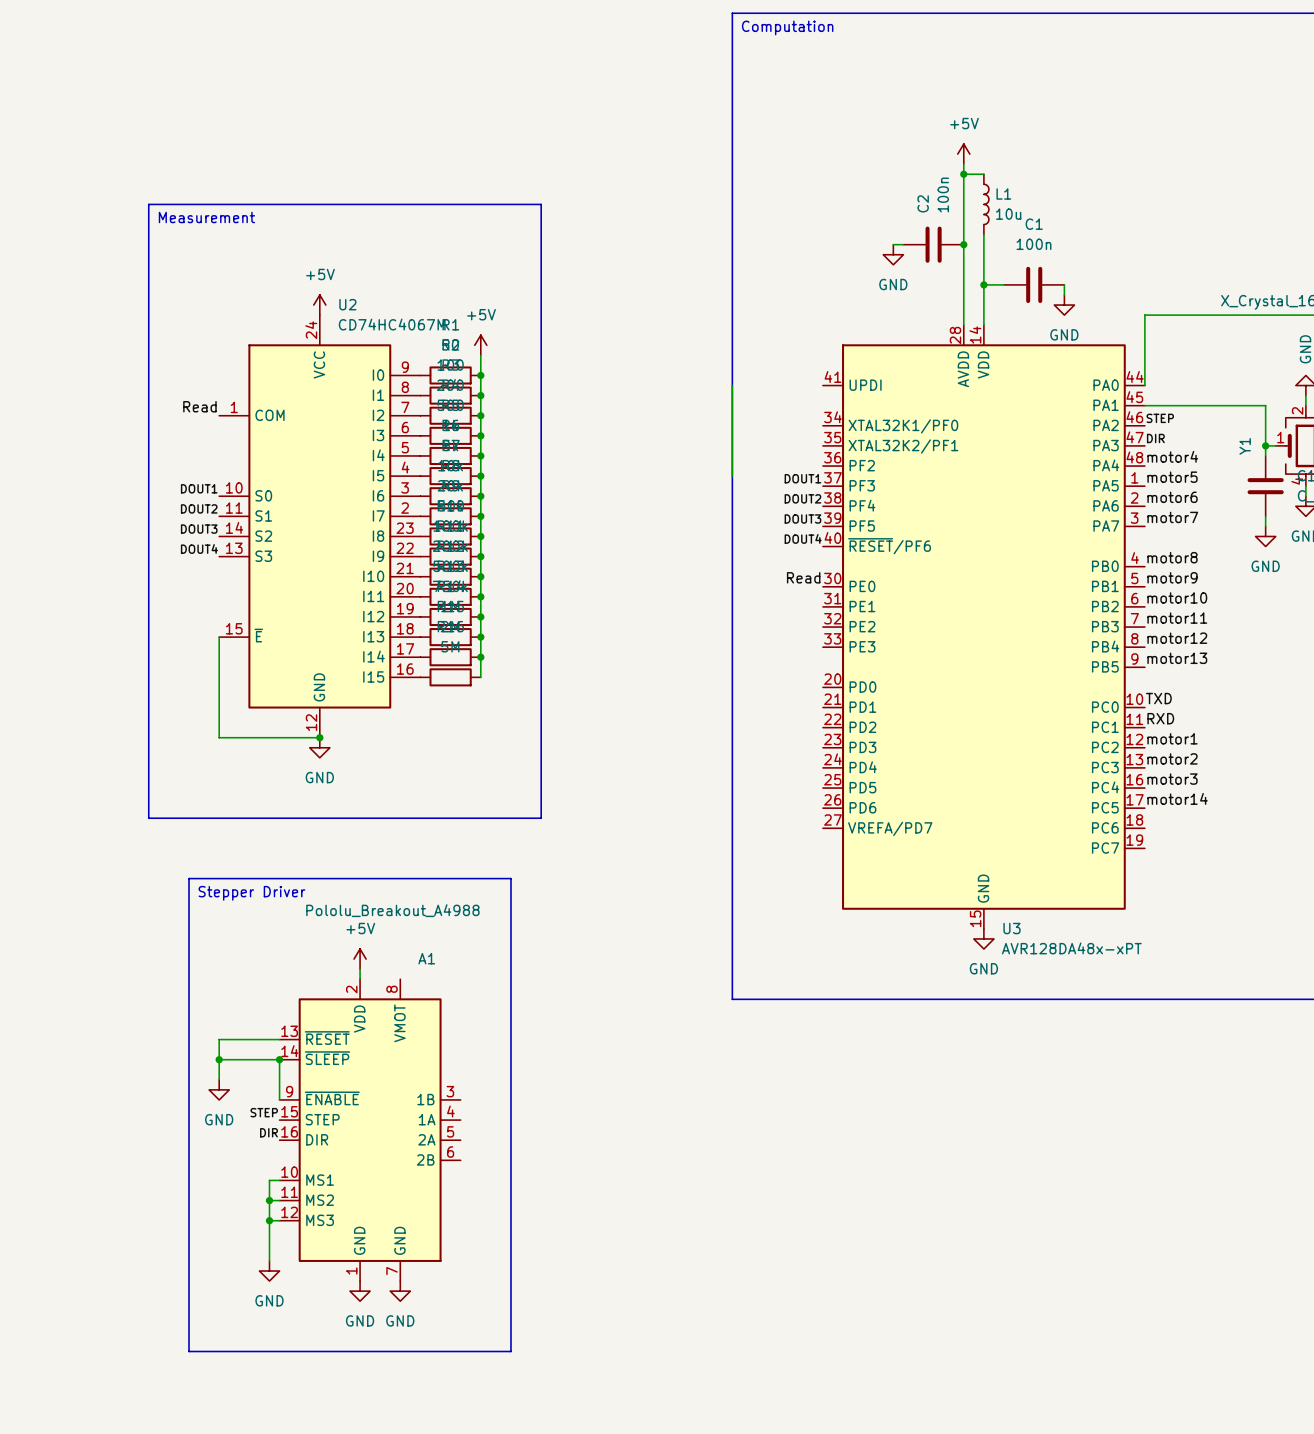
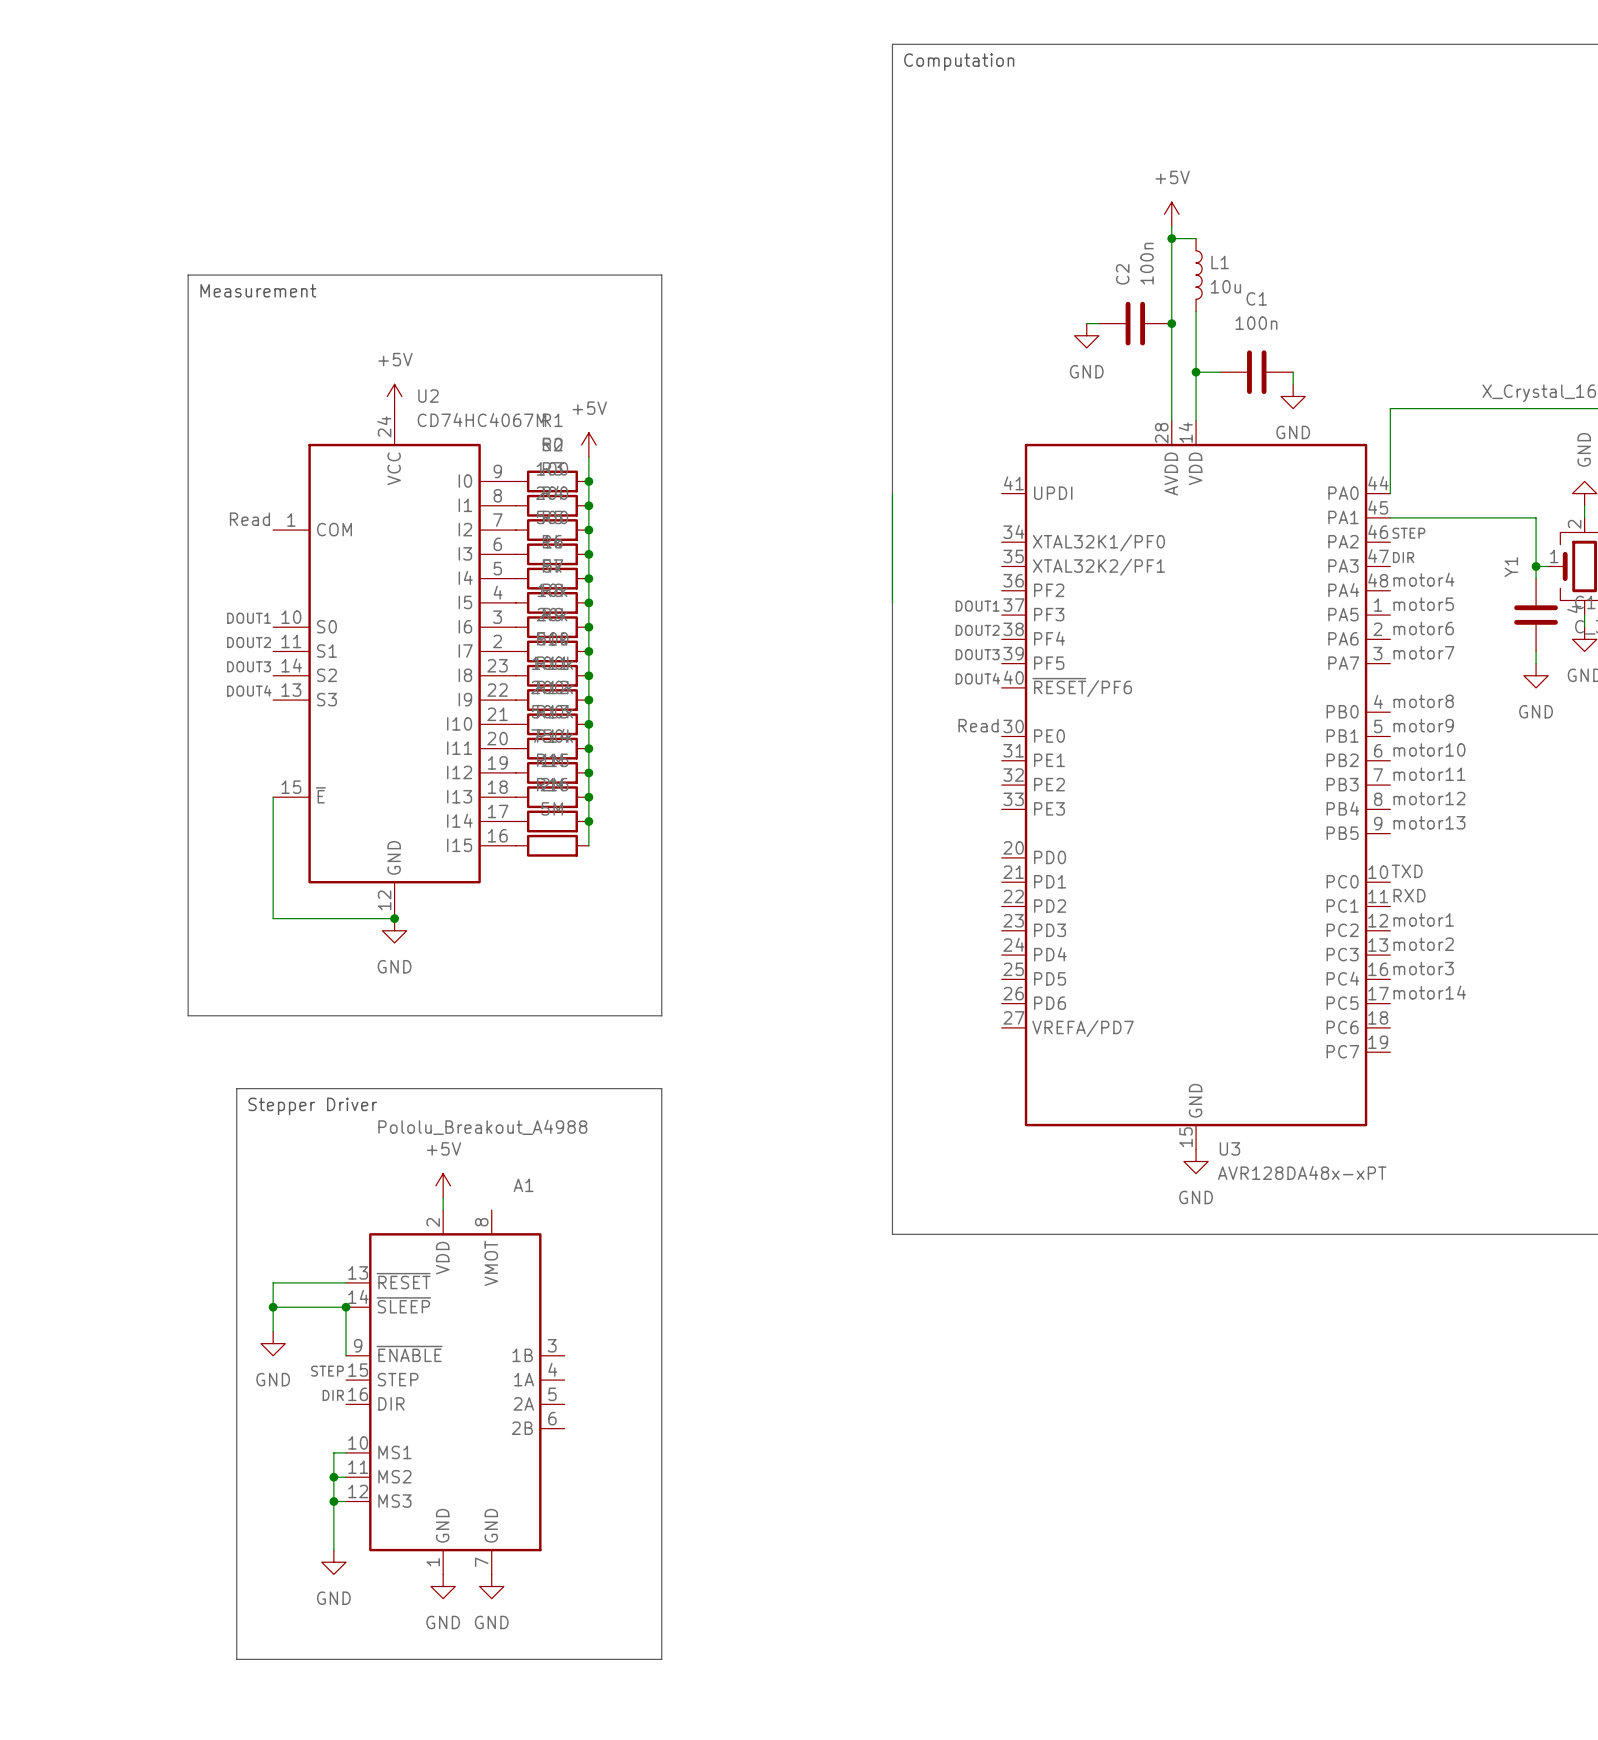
line: (510, 878) (510, 1351) -> (625, 1088) (661, 1088) (661, 1659) (625, 1659)

